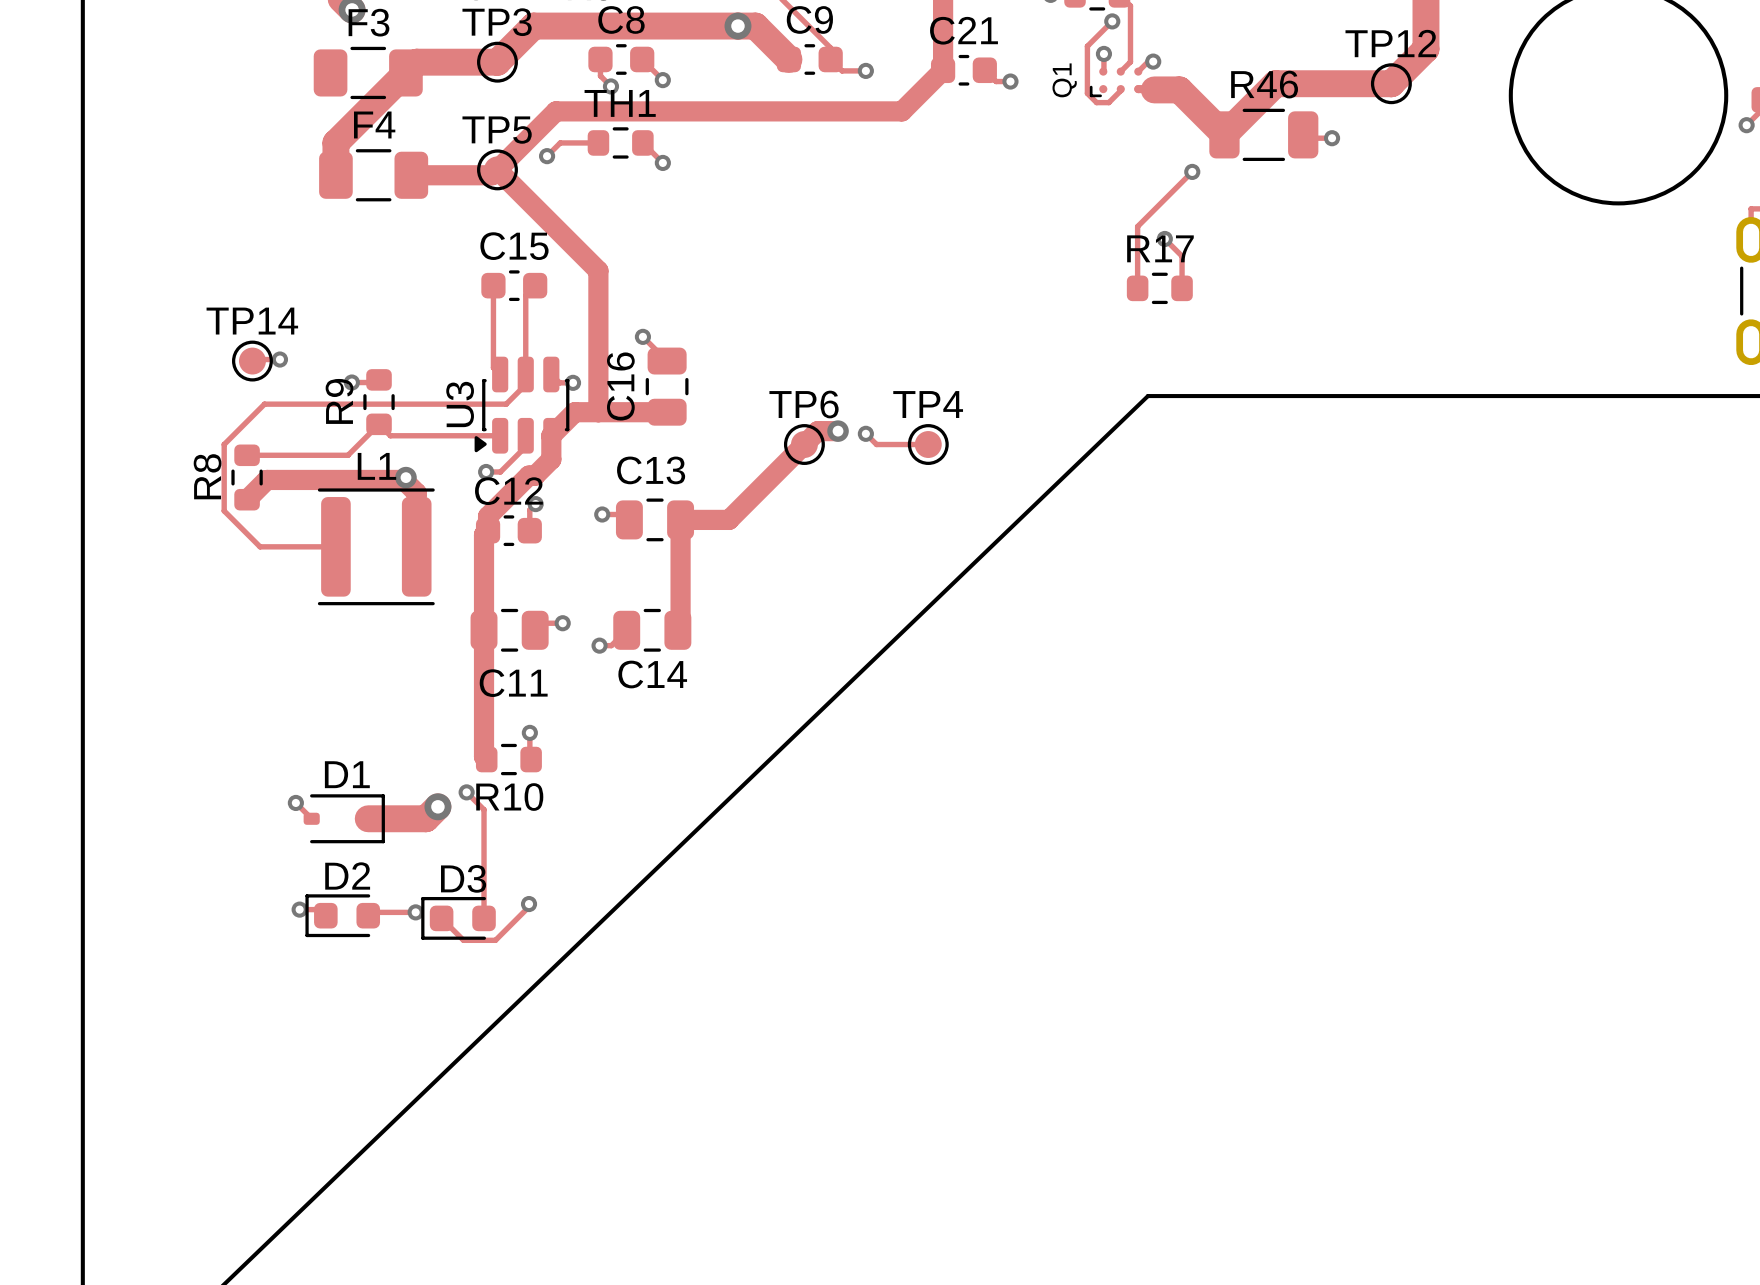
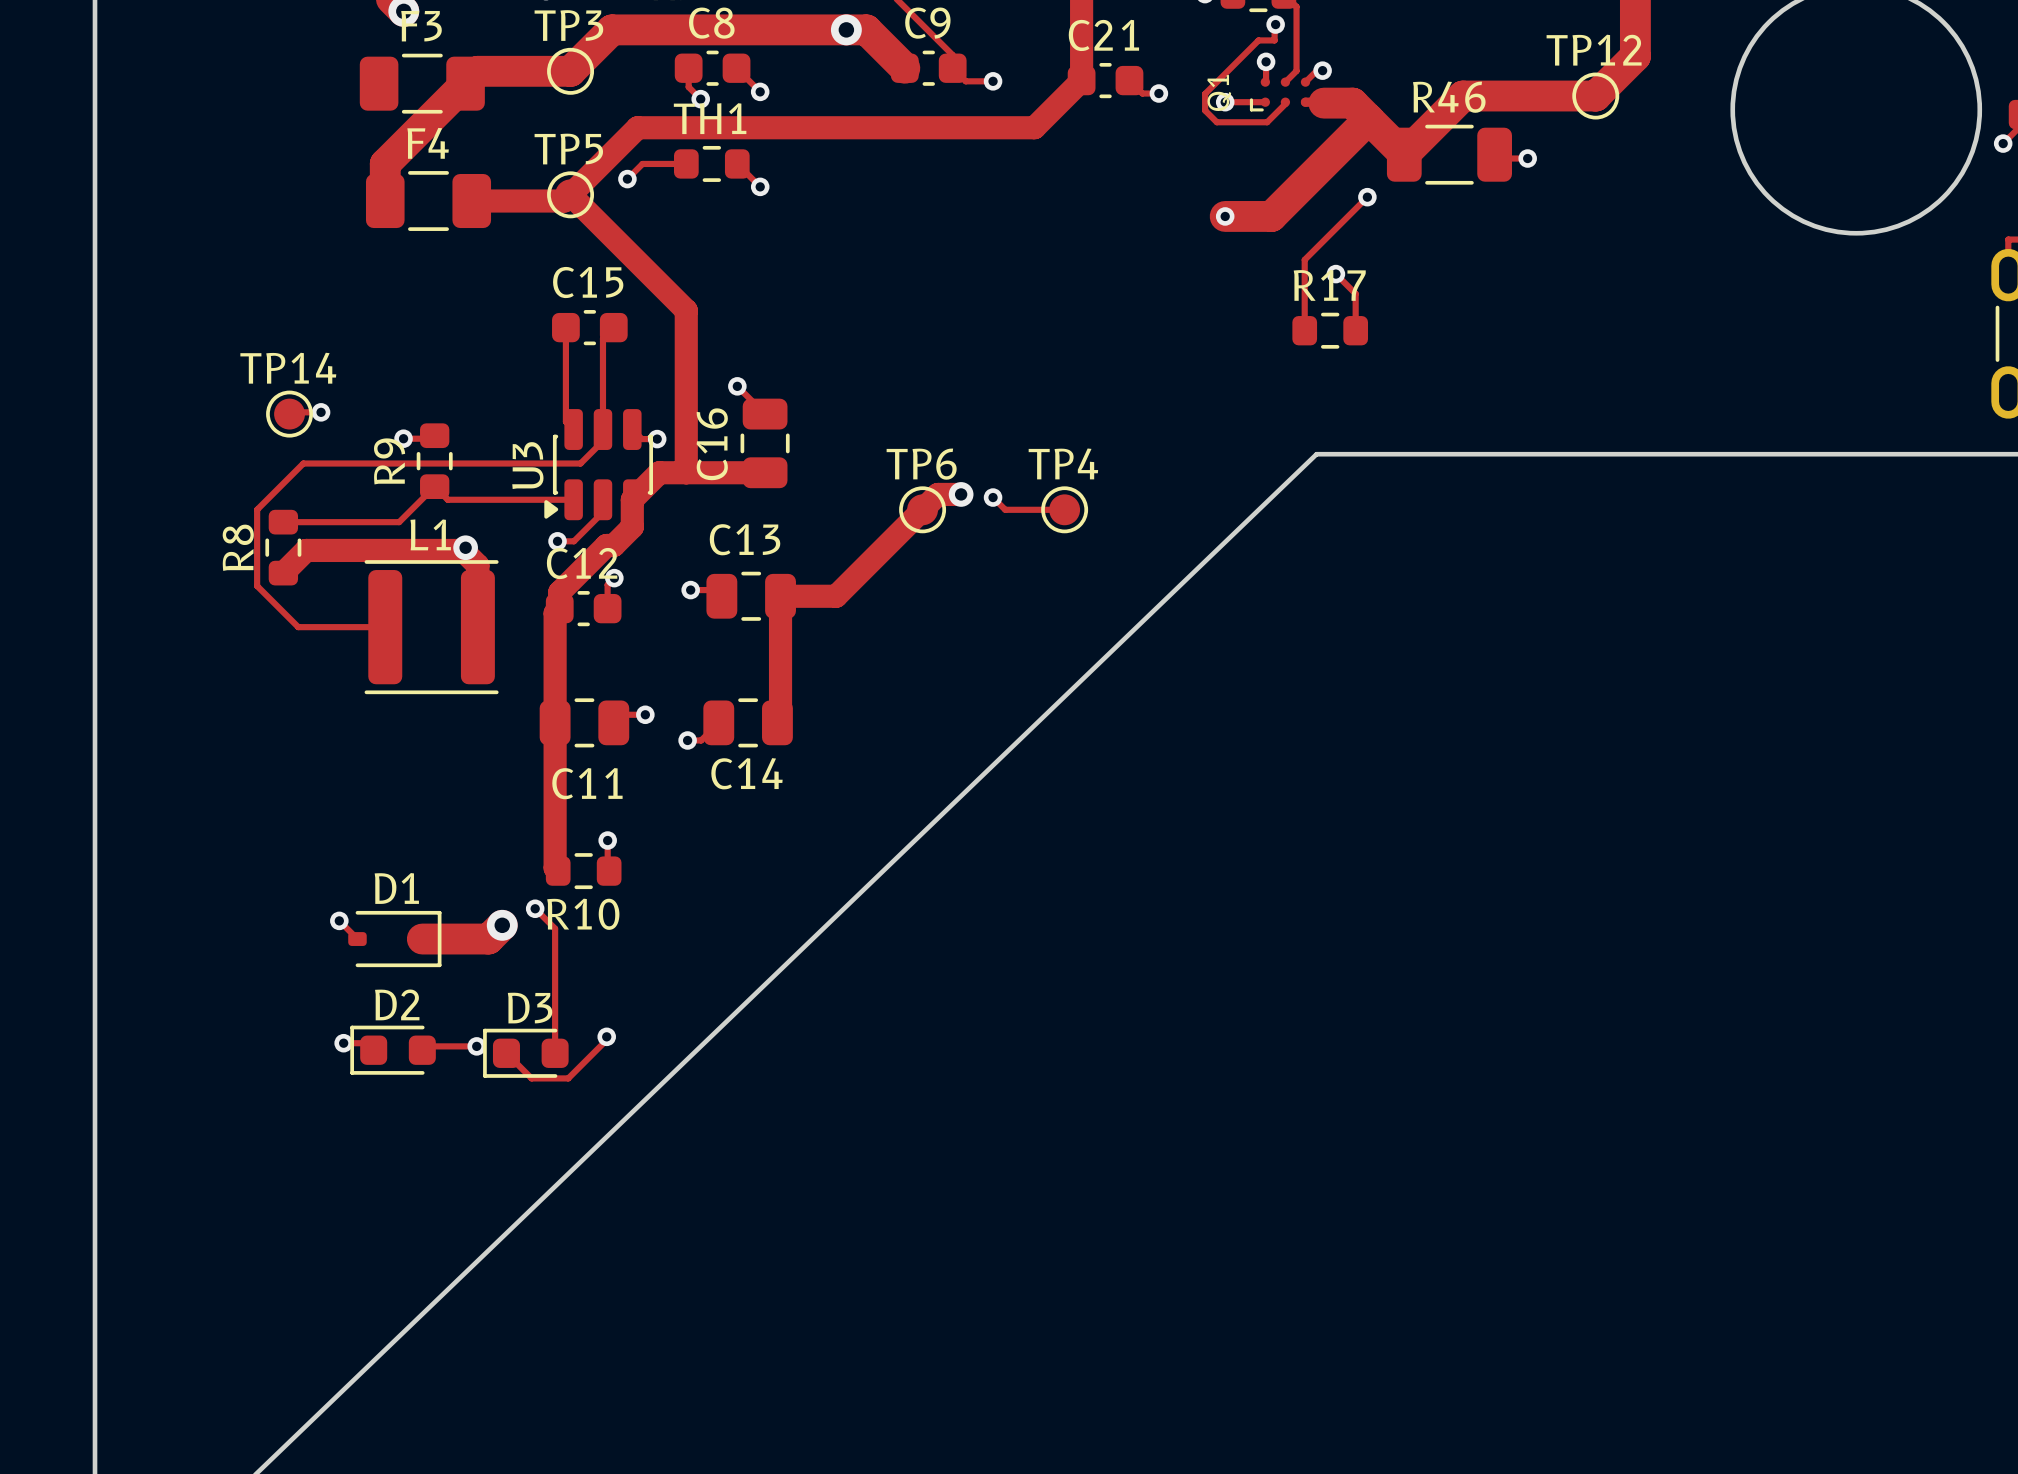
track: (1111, 22) (1087, 46) (1087, 93) (1096, 102) (1108, 102) -> (1274, 25) (1274, 40) (1258, 40) (1205, 93) (1205, 110) (1216, 122) (1267, 122) (1271, 117)
track: none -> (1225, 102) (1265, 102)
via: none -> (1225, 102)
track: none -> (1368, 119) (1271, 216) (1225, 216)
via: none -> (1225, 216)

